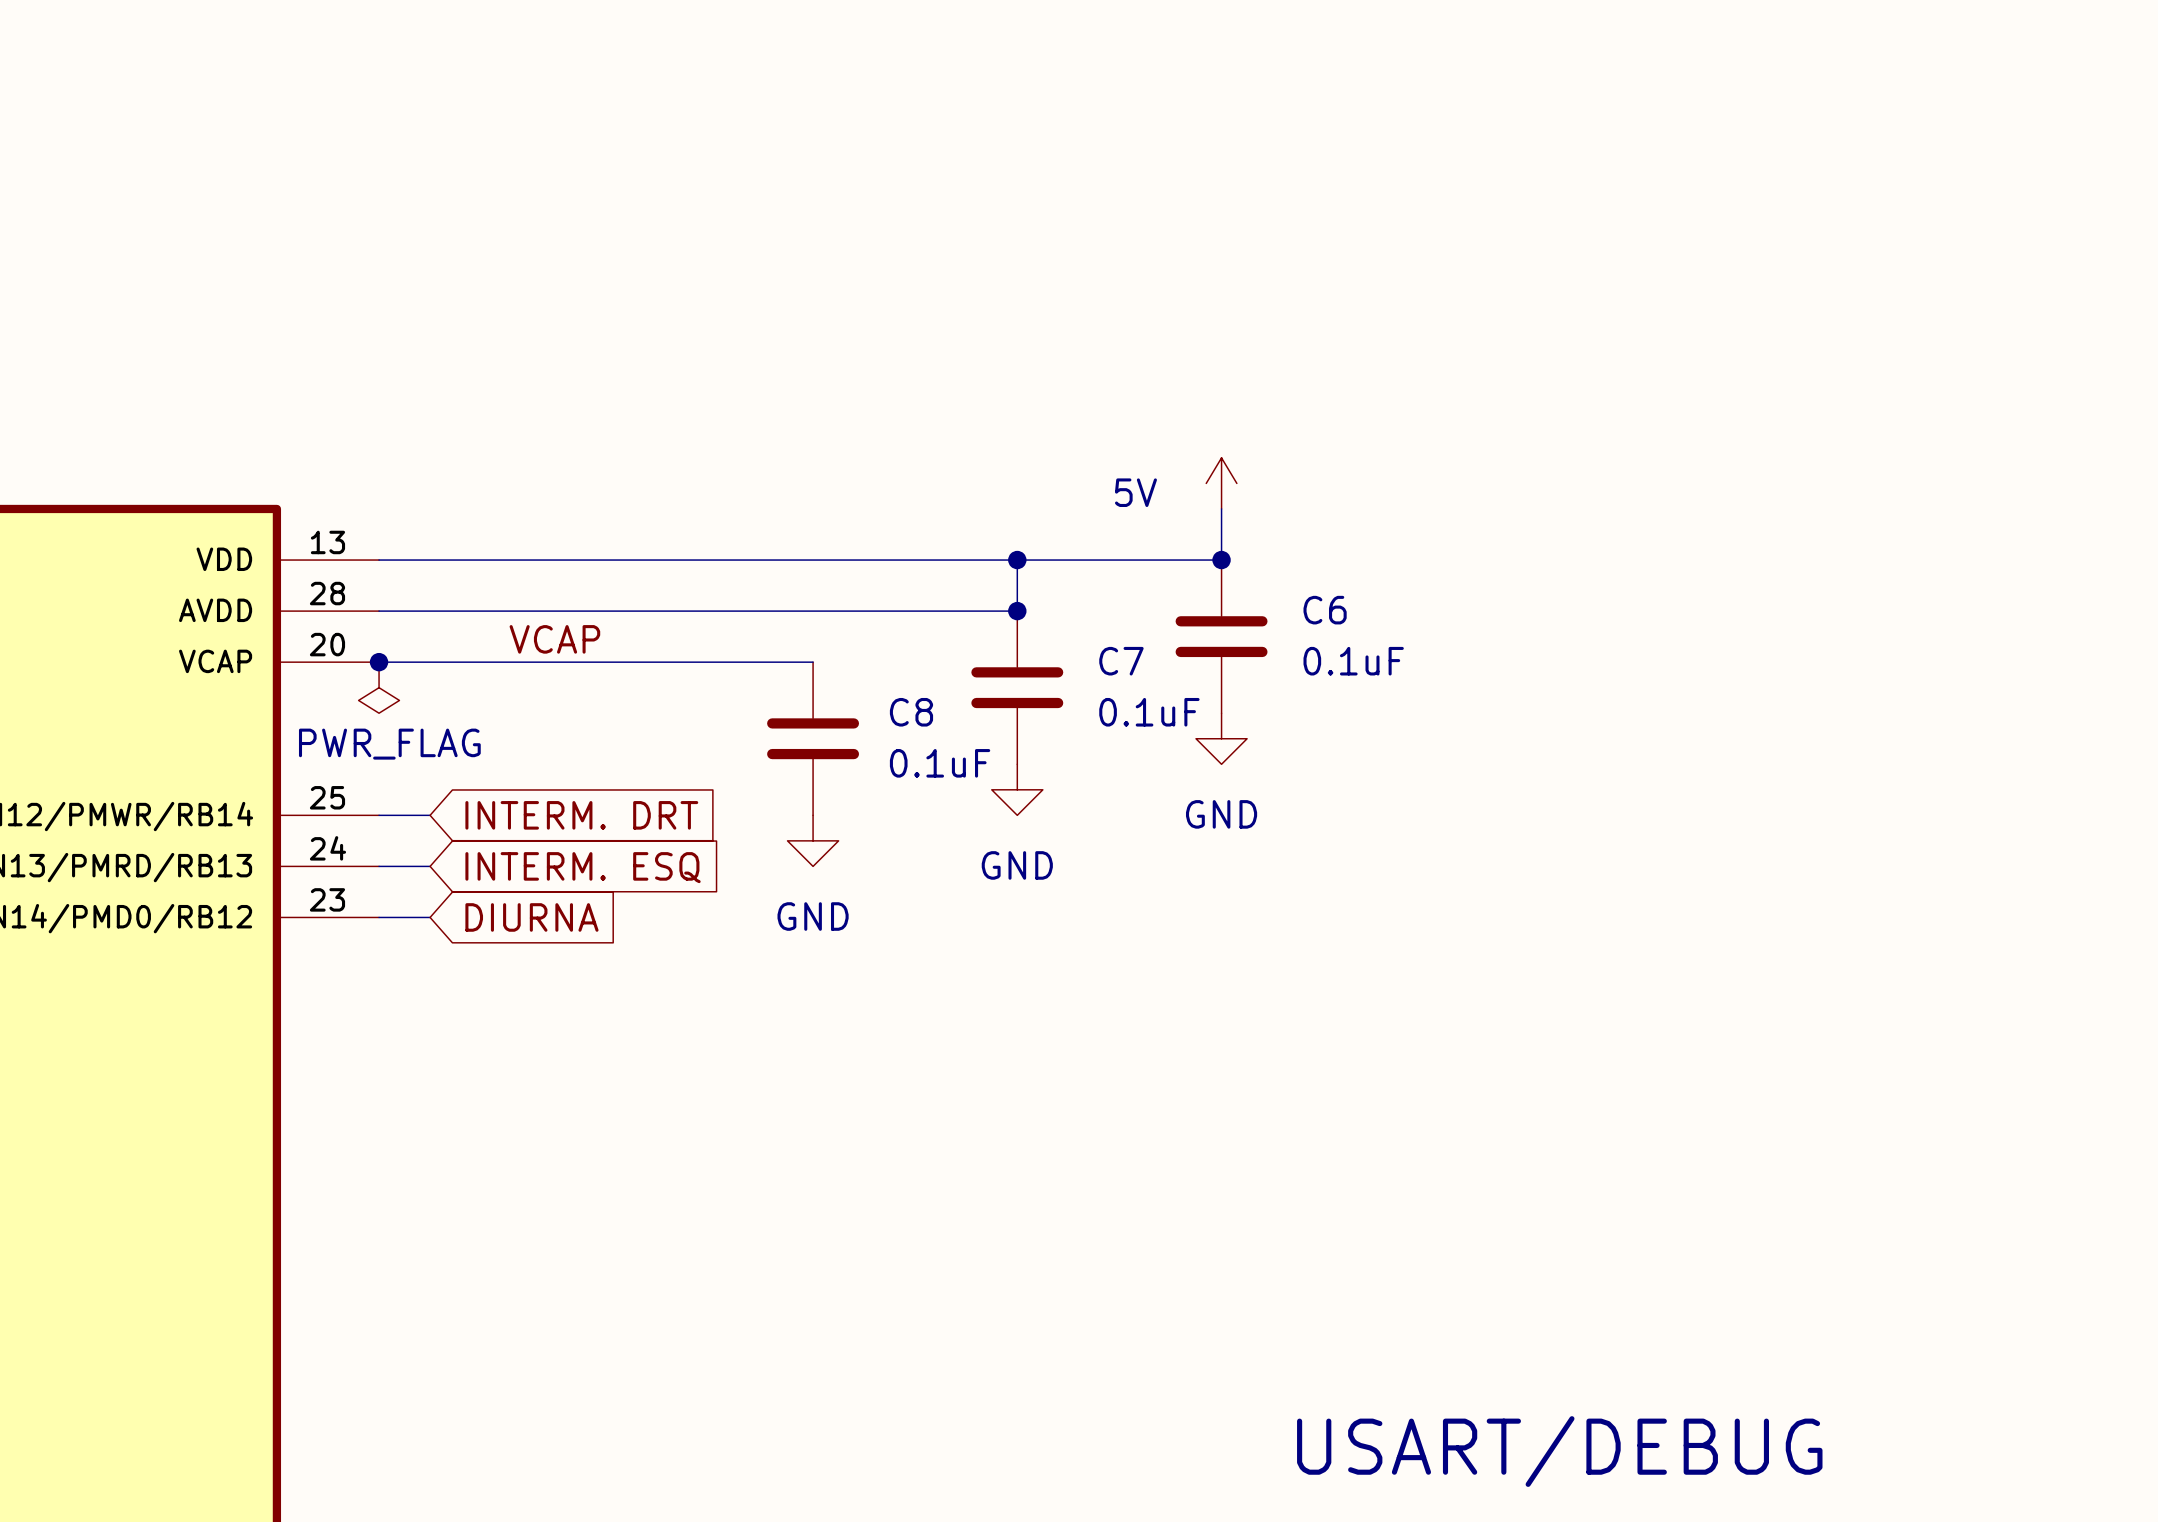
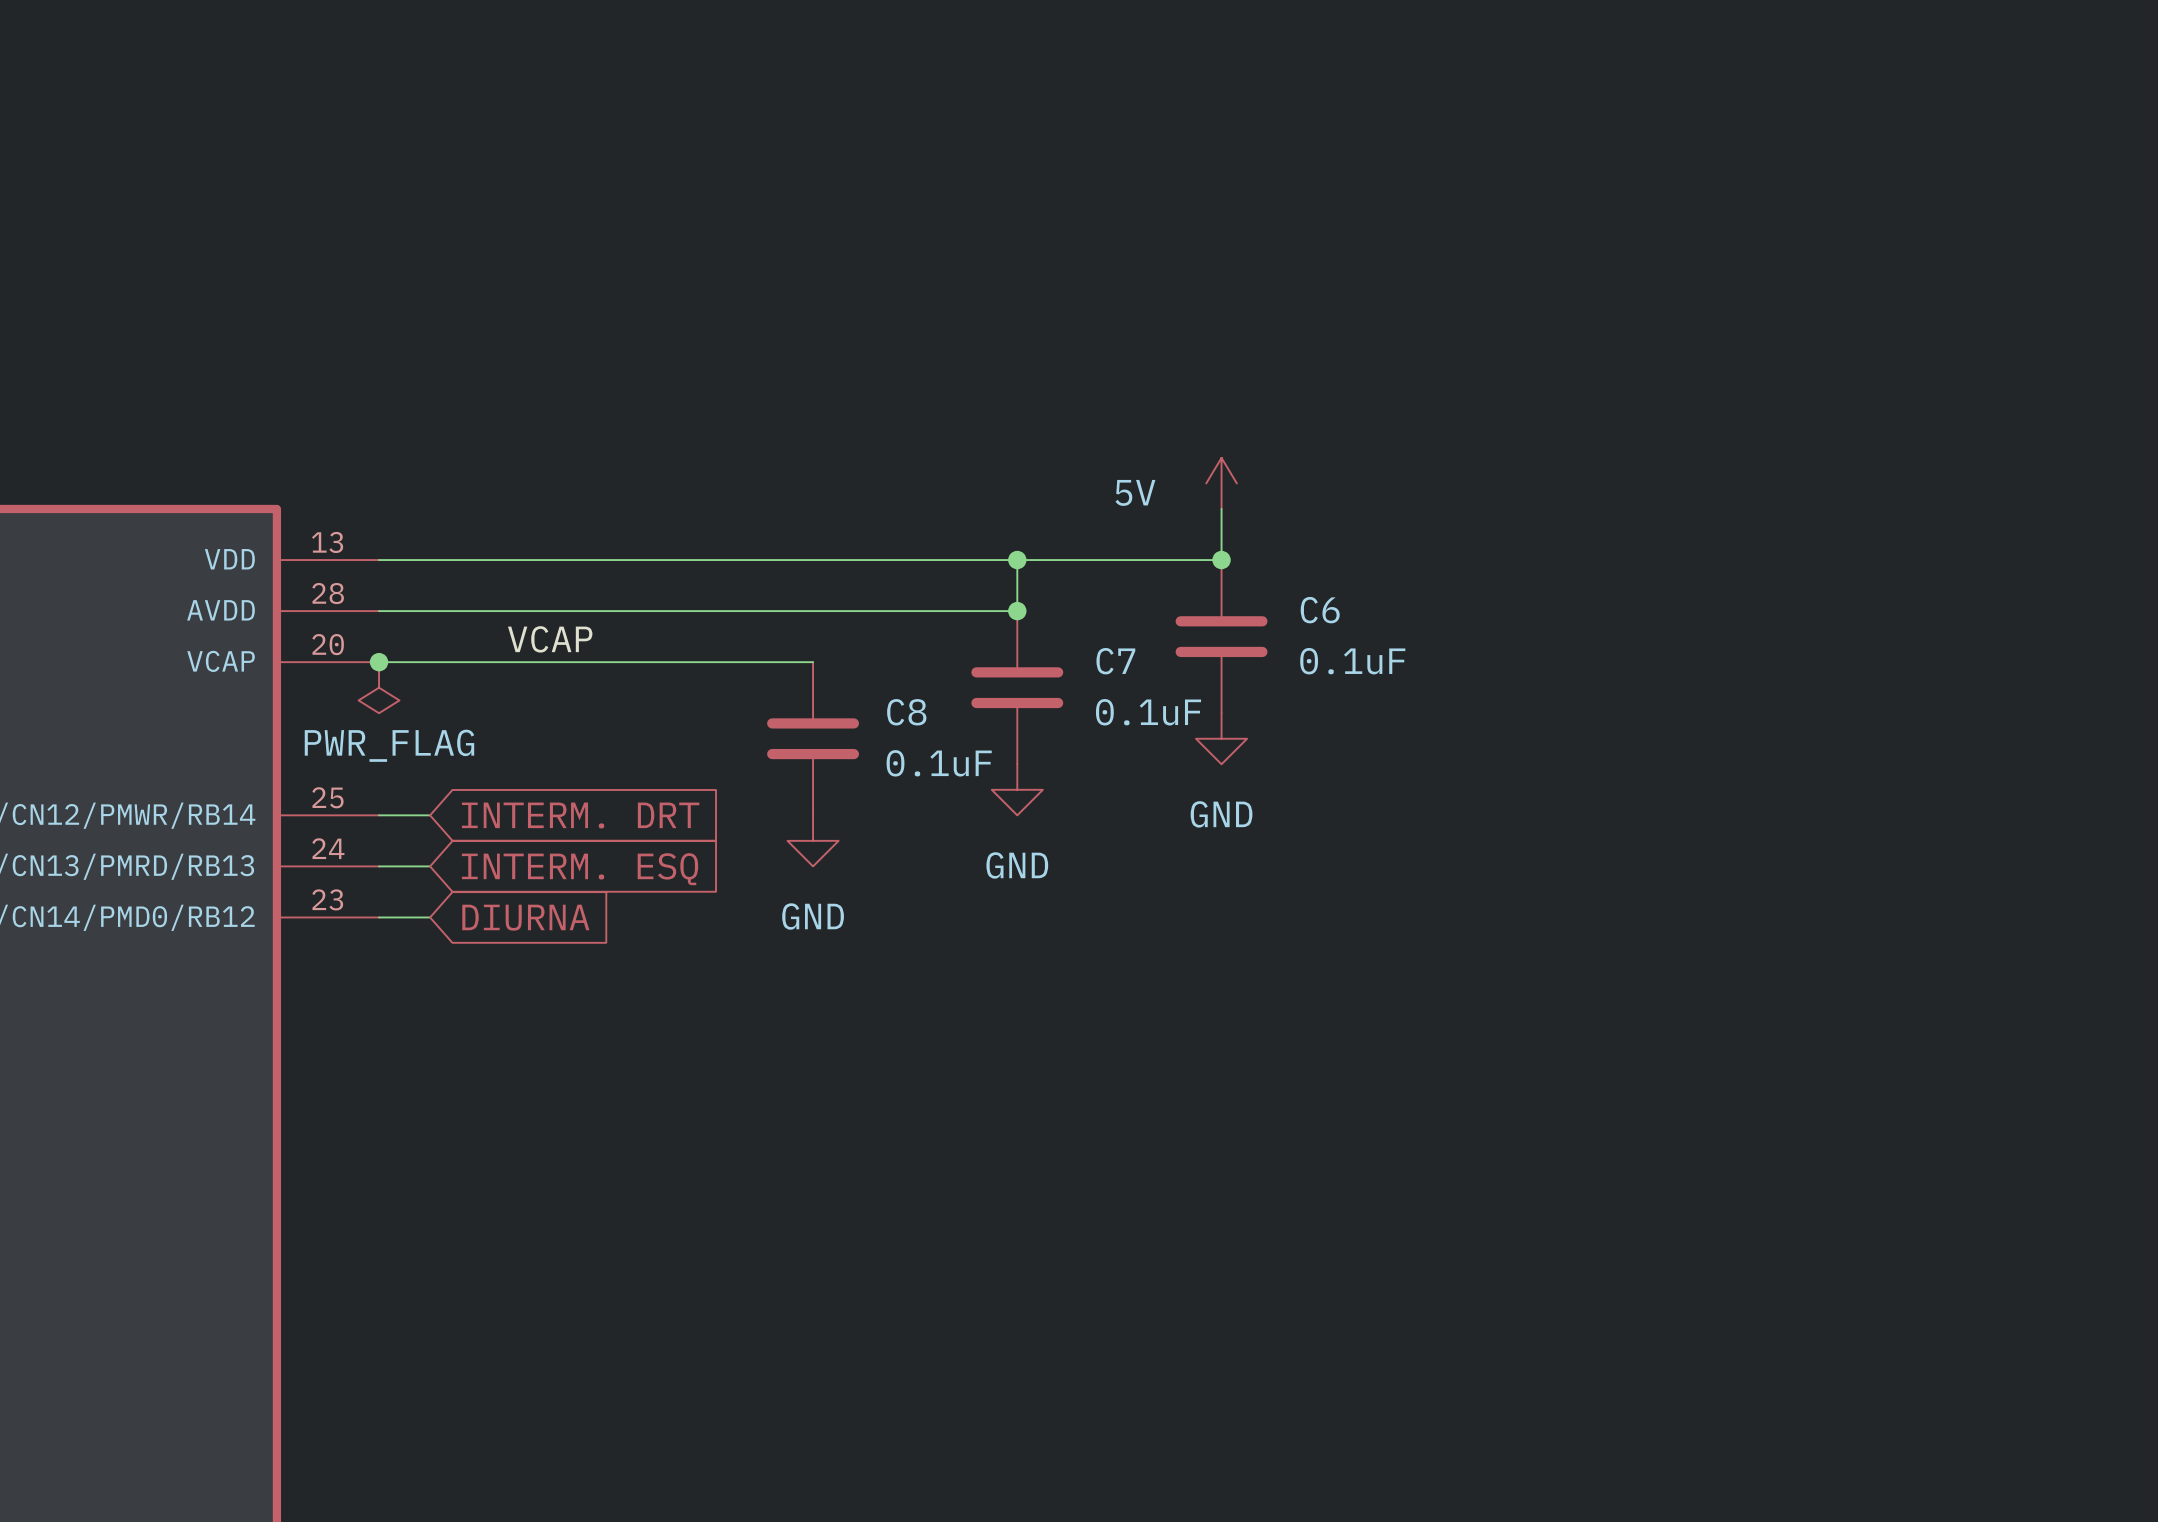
text: USART/DEBUG (1559, 1451) -> none

